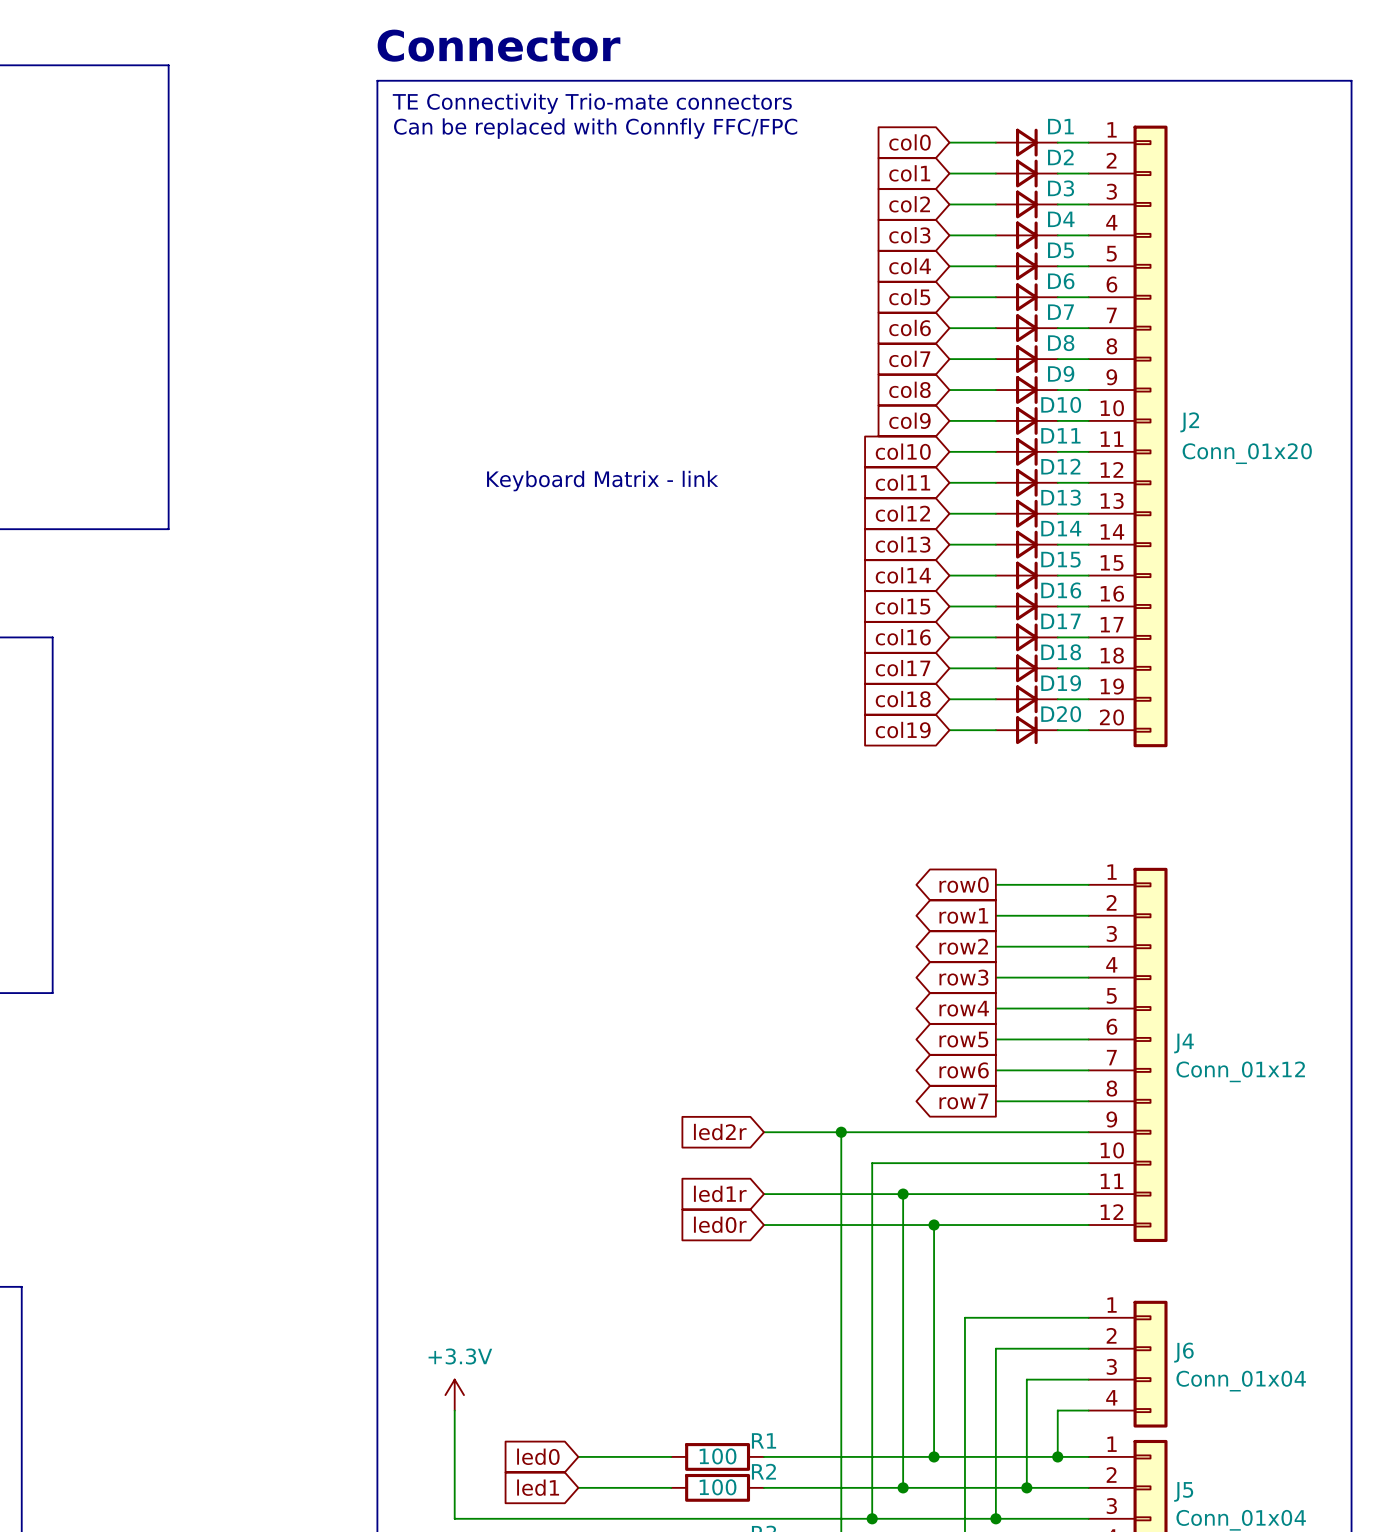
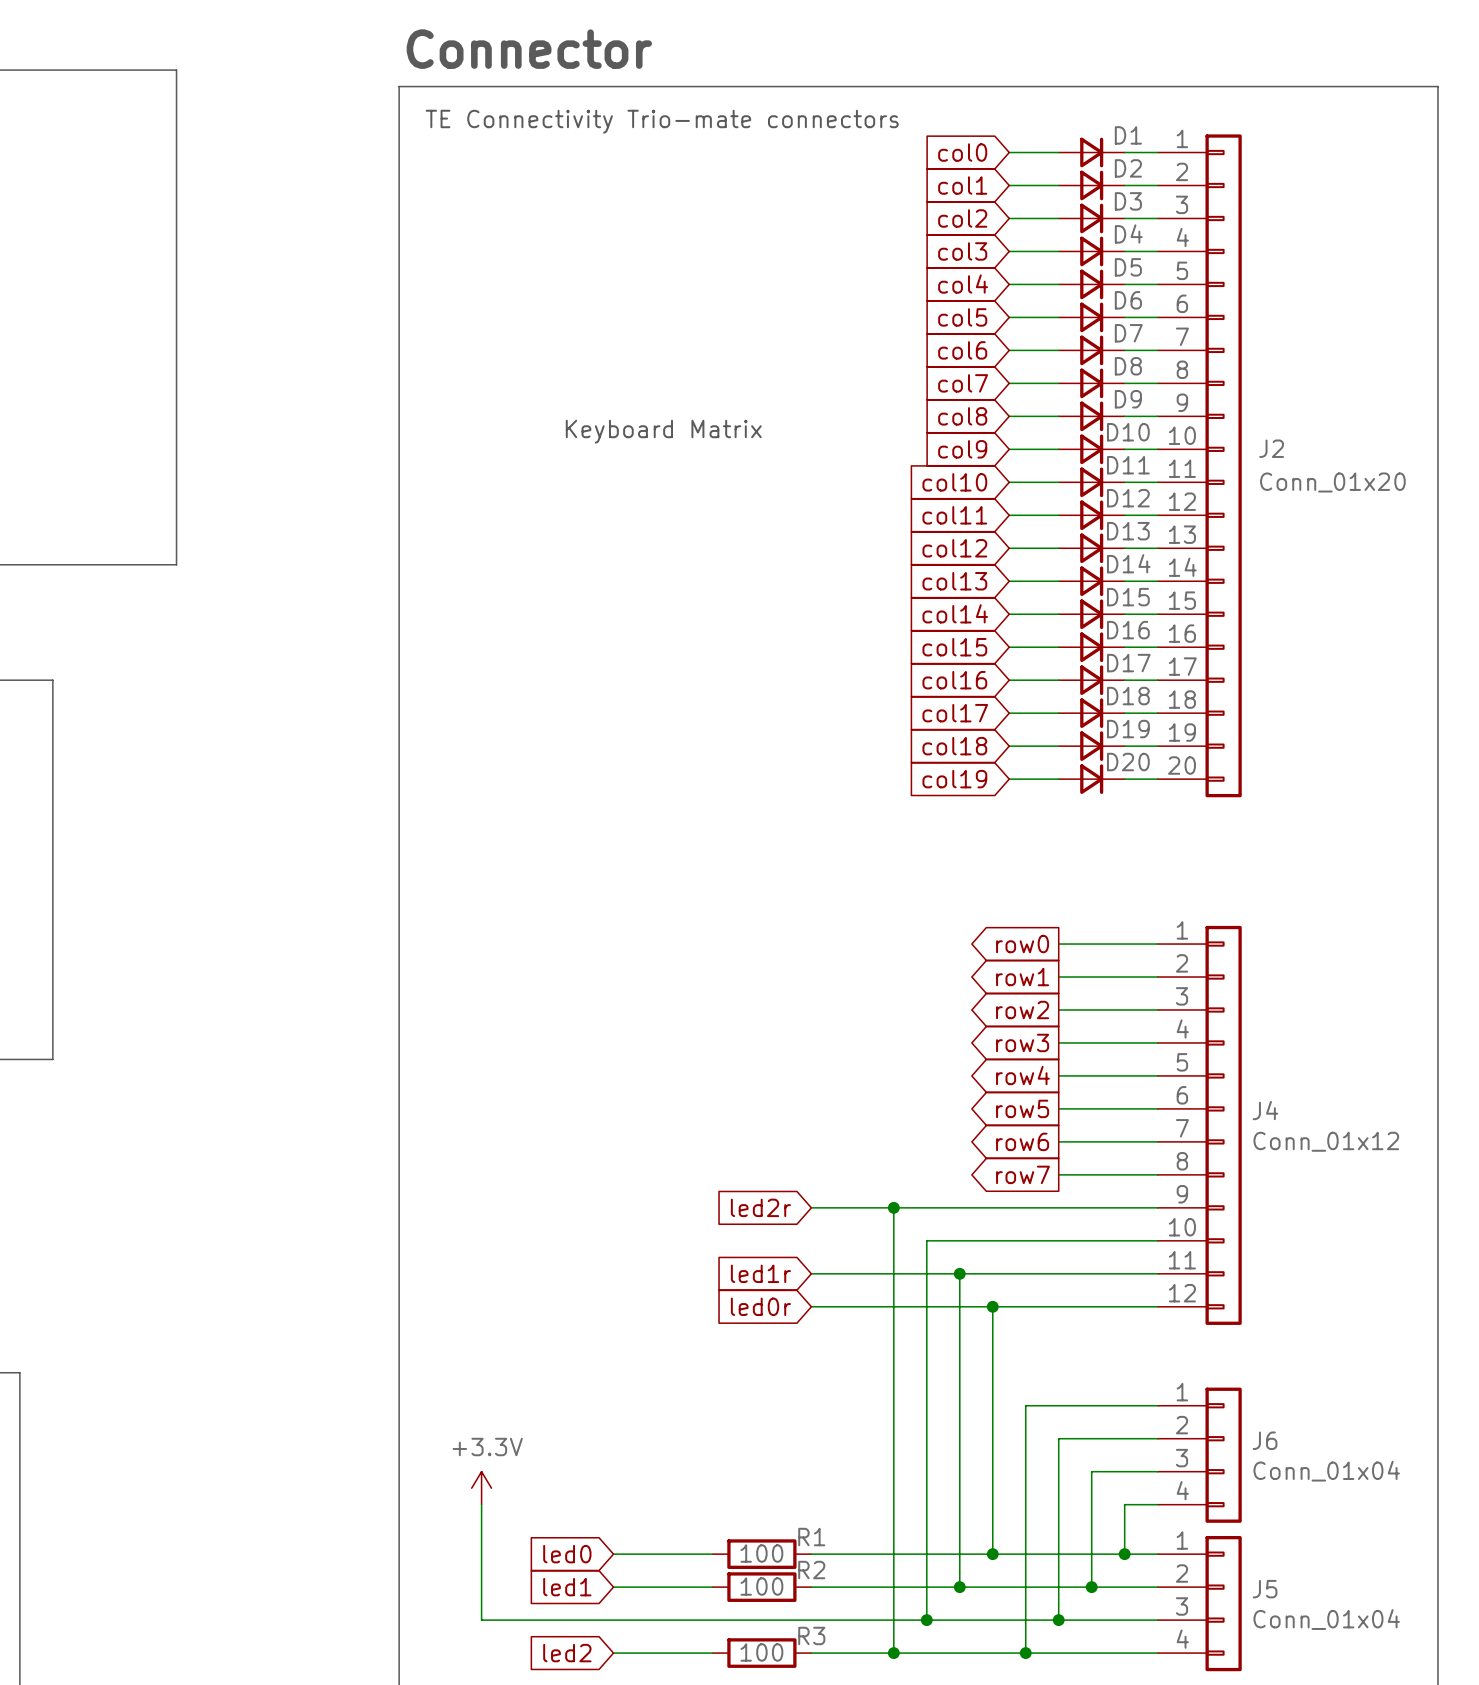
text position: TE Connectivity Trio-mate connectors (592, 103) -> TE Connectivity Trio-mate connectors (662, 121)
text: Can be replaced with Connfly FFC/FPC (595, 128) -> none
text: none -> Keyboard Matrix (663, 431)
text: Keyboard Matrix - link (602, 481) -> none

